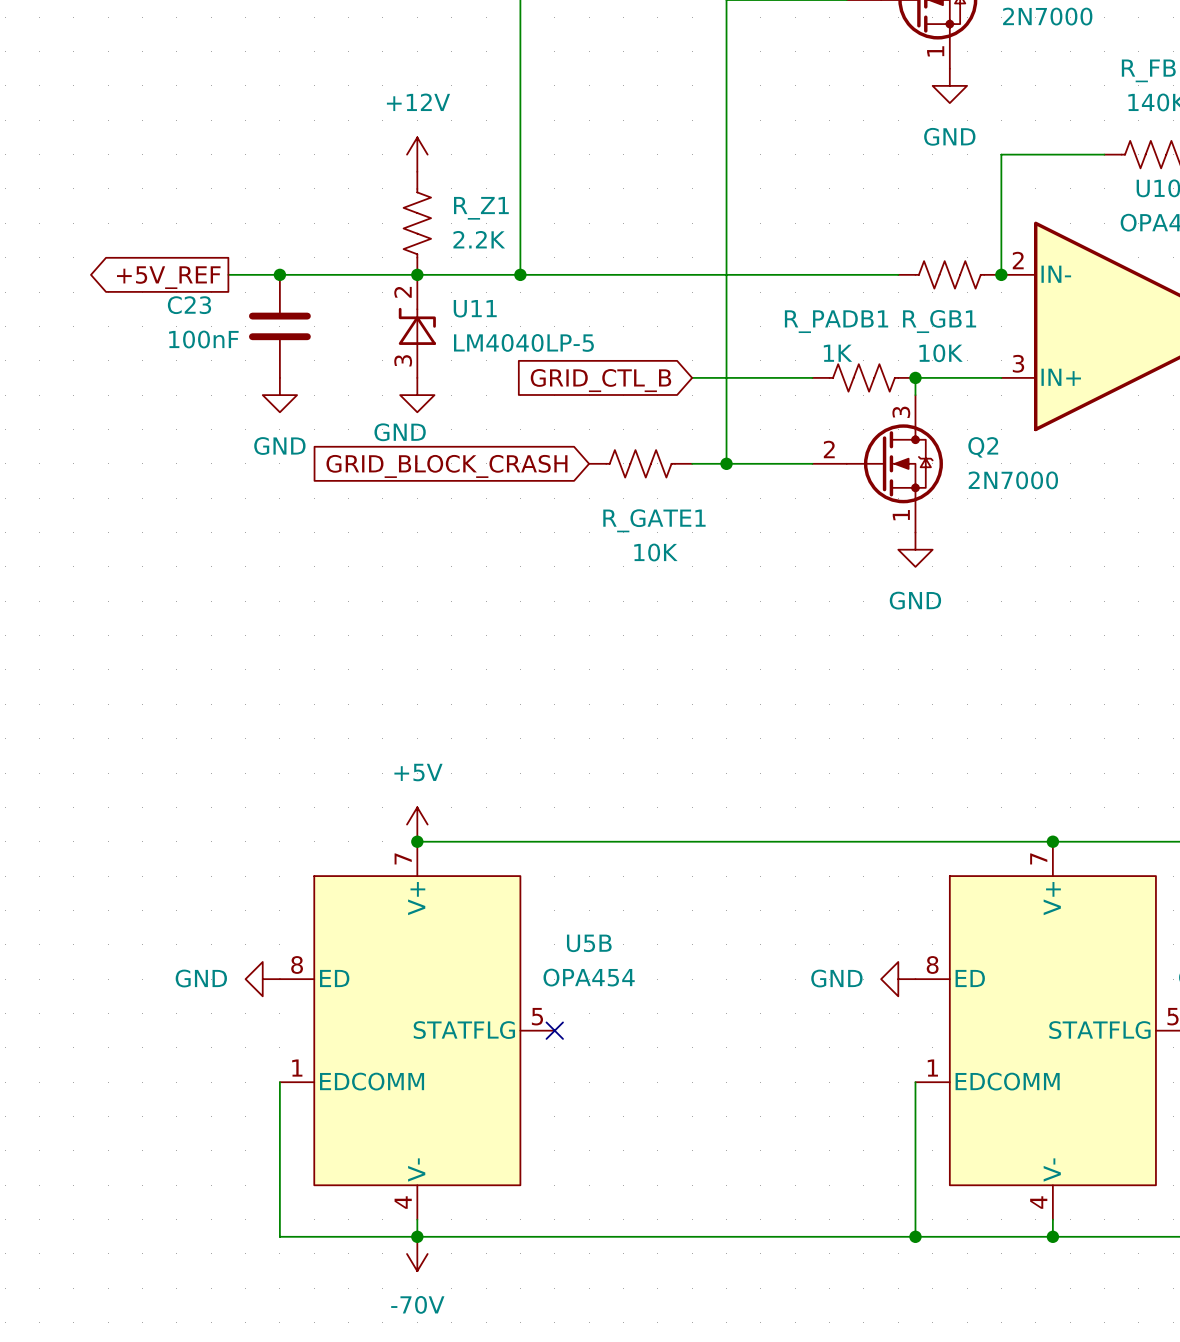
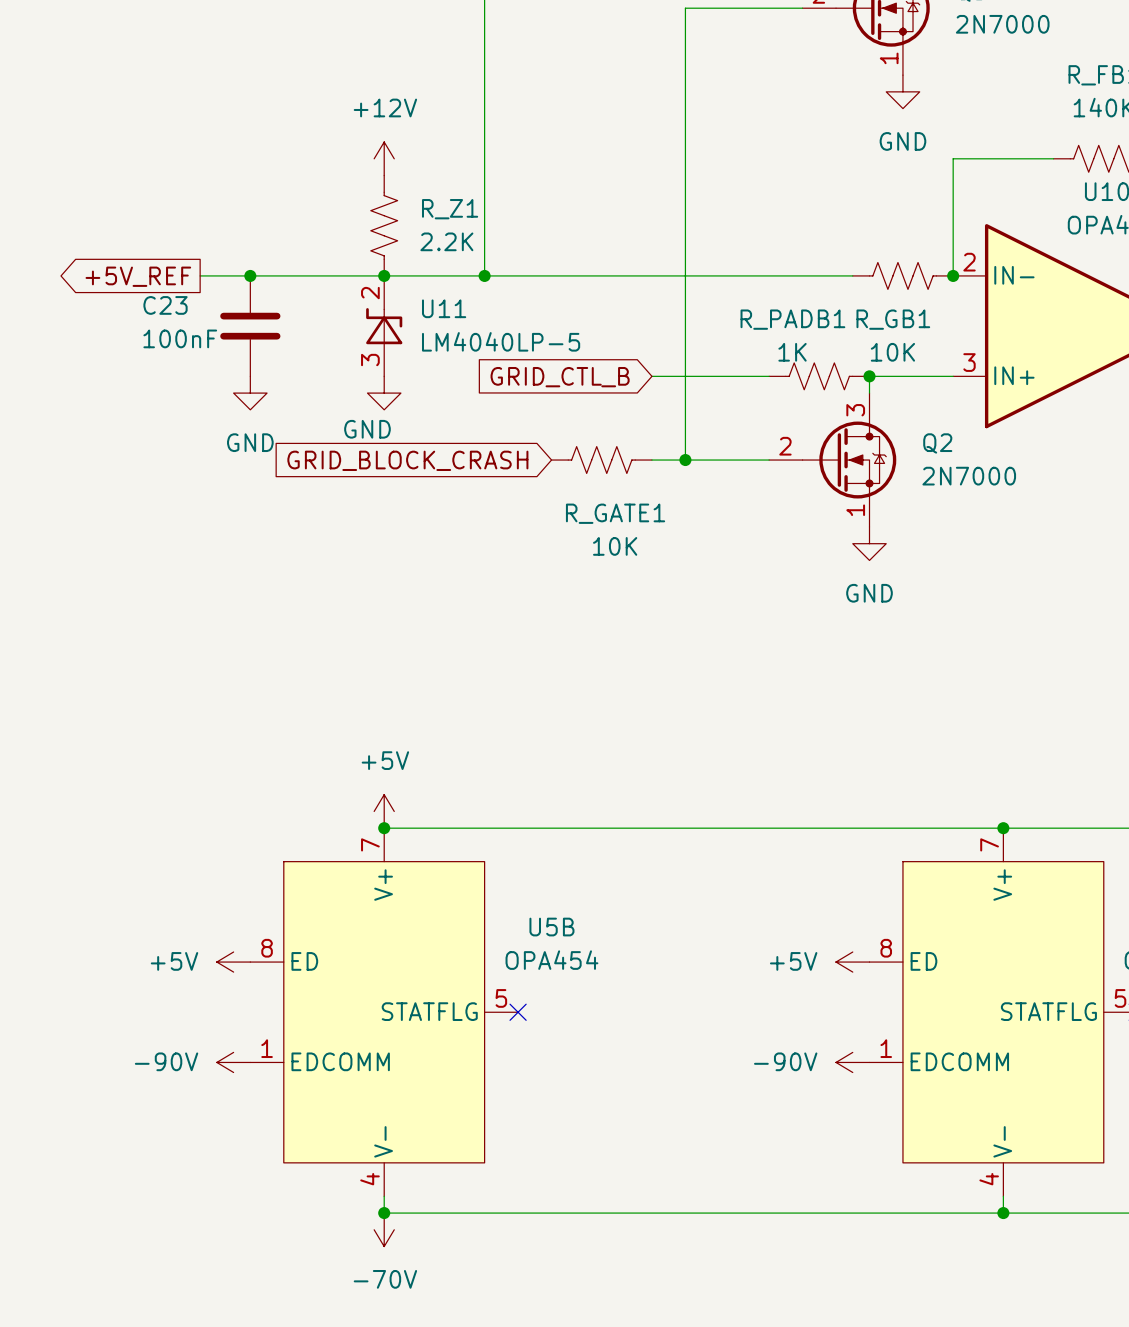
power symbol: GND (262, 979) -> +5V (233, 962)
power symbol: GND (898, 979) -> +5V (852, 962)
power symbol: none -> -90V (233, 1062)
wire: (279, 1082) (279, 1236) (417, 1236) -> none
power symbol: none -> -90V (852, 1062)
wire: (915, 1082) (915, 1236) -> none
junction: (915, 1236) -> none

